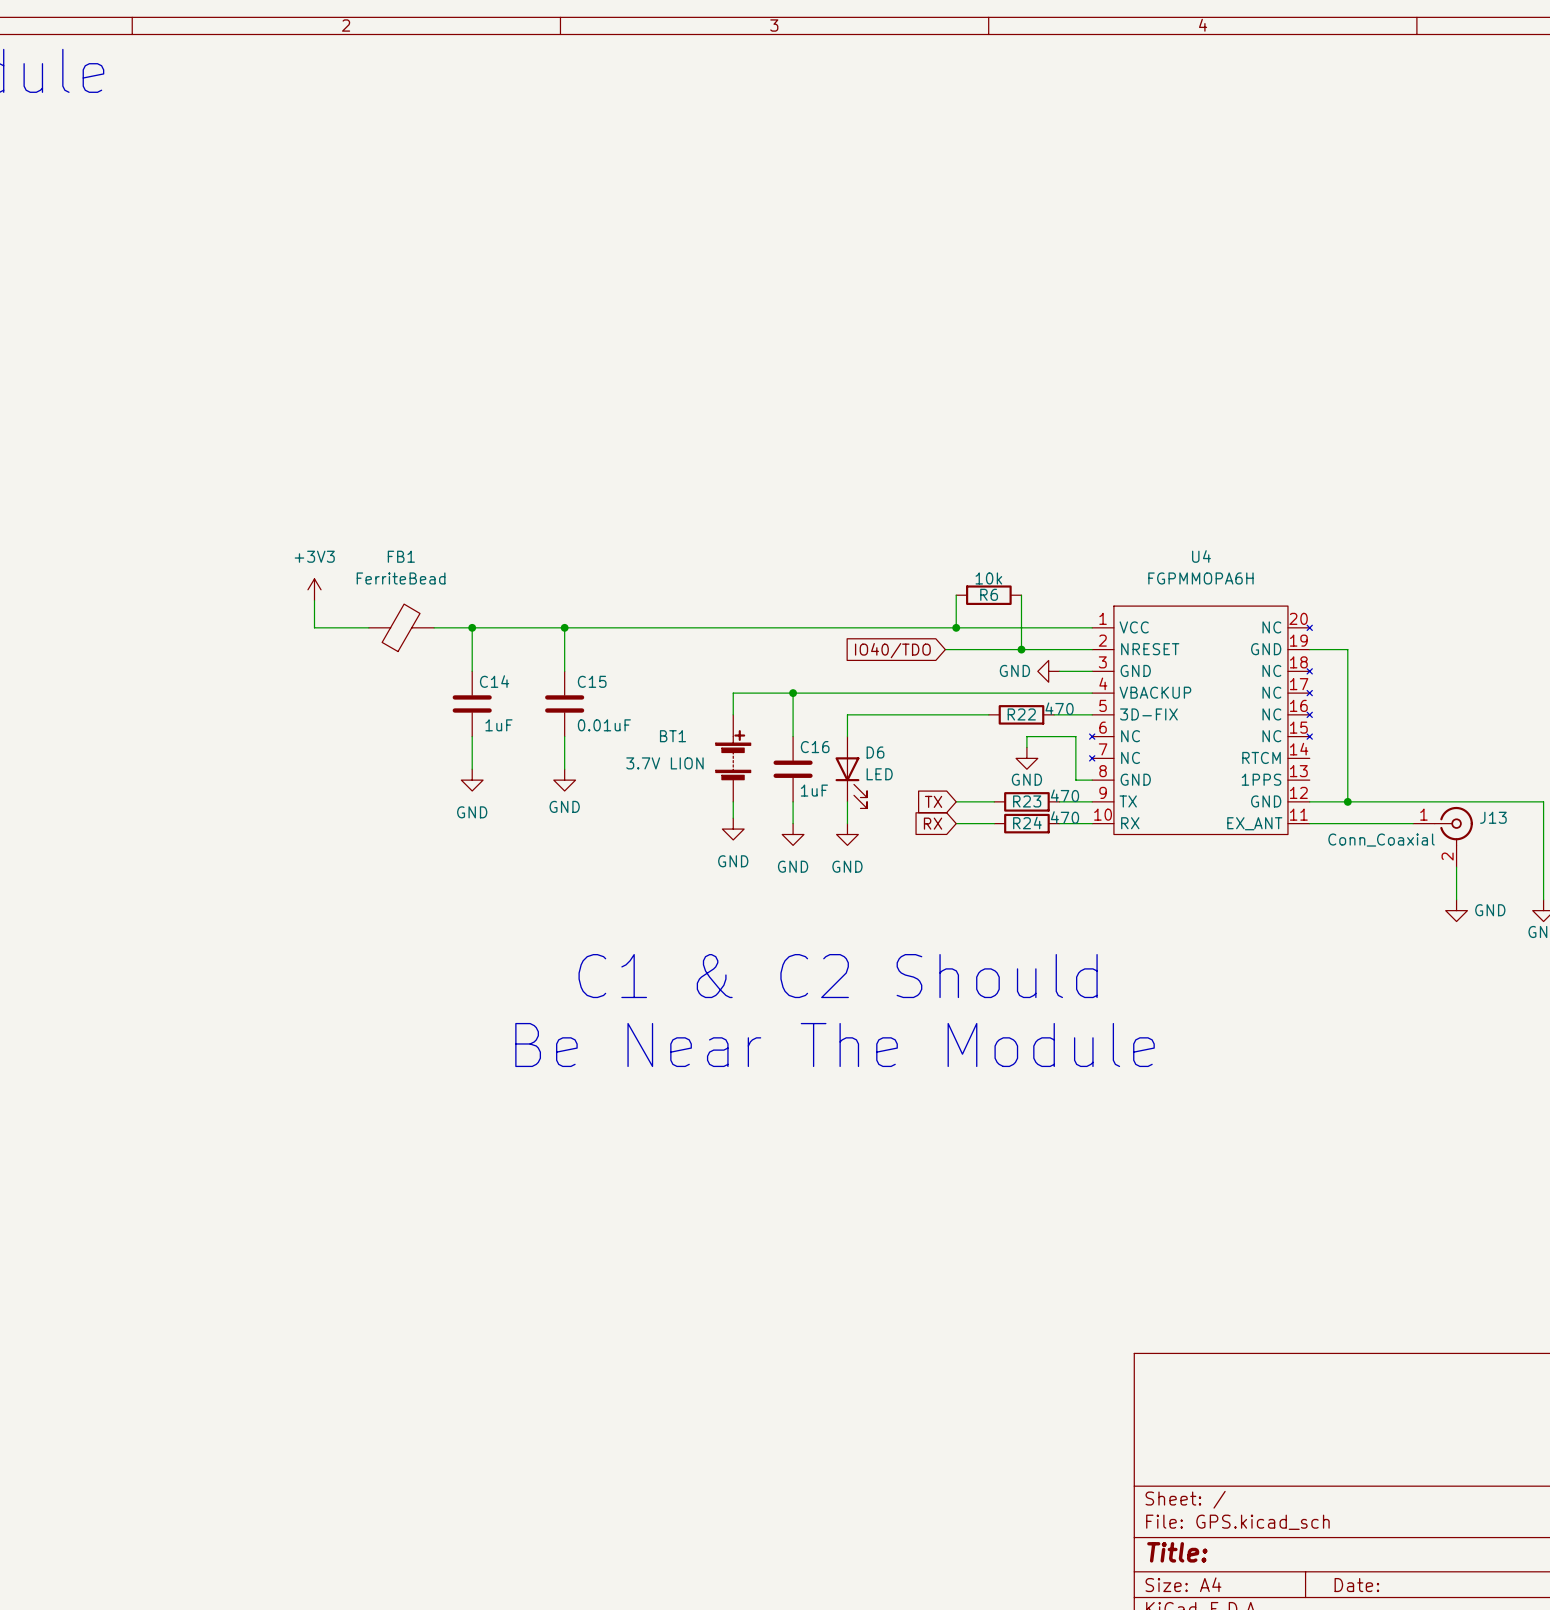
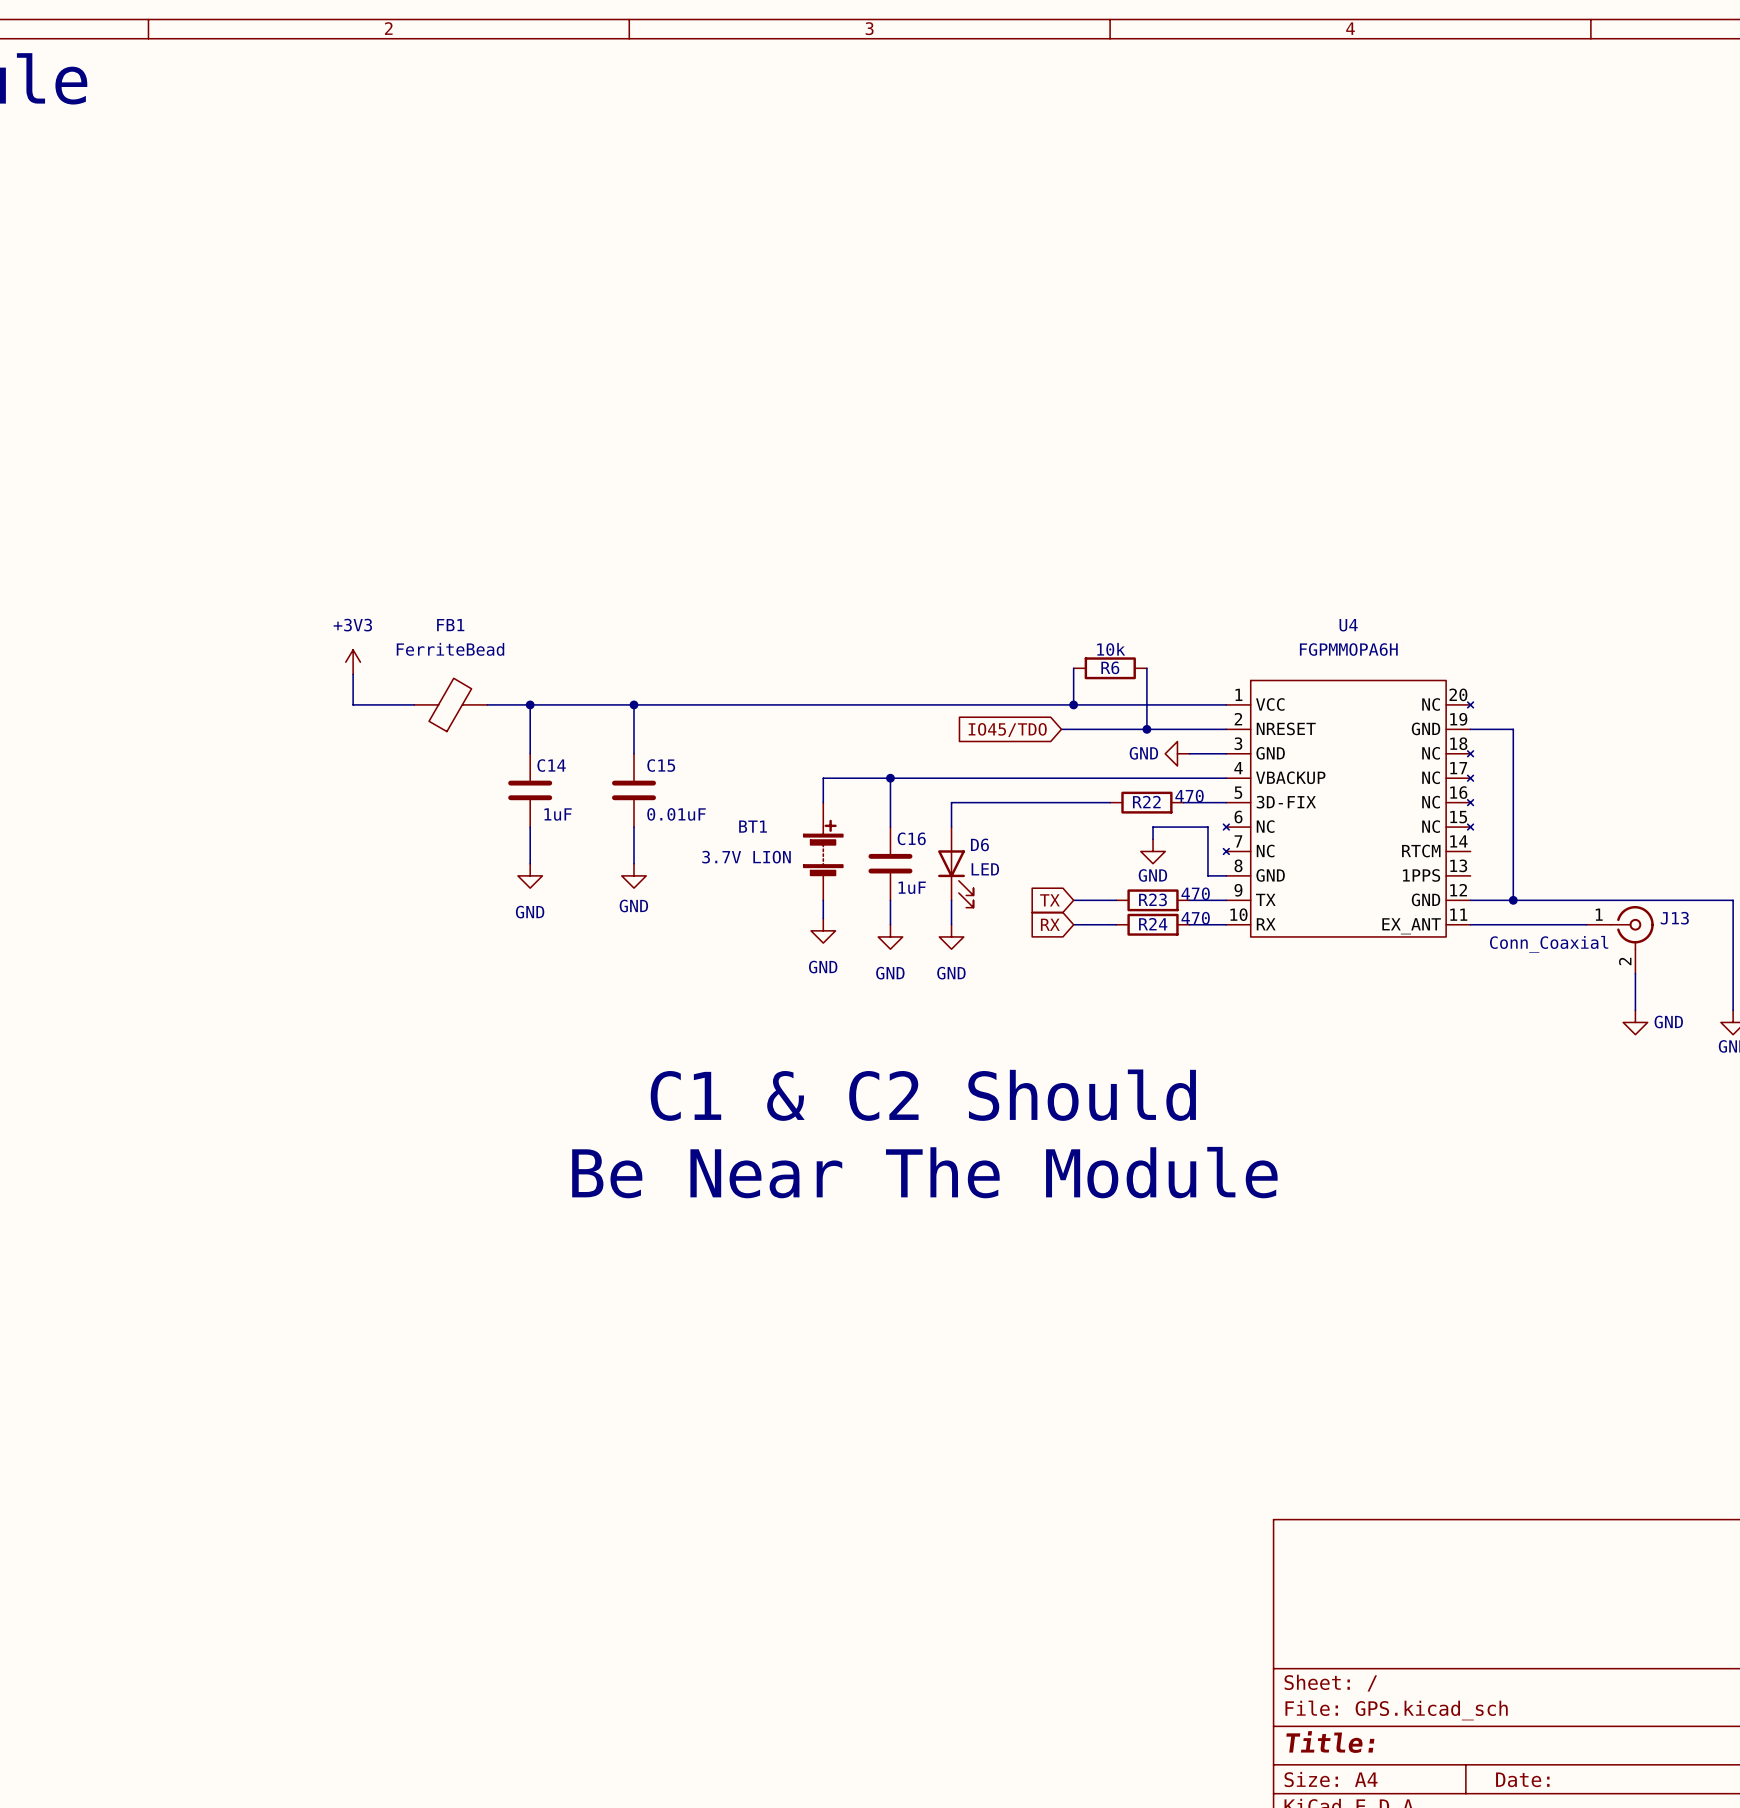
global label: IO40/TDO (892, 650) -> IO45/TDO (1007, 730)

